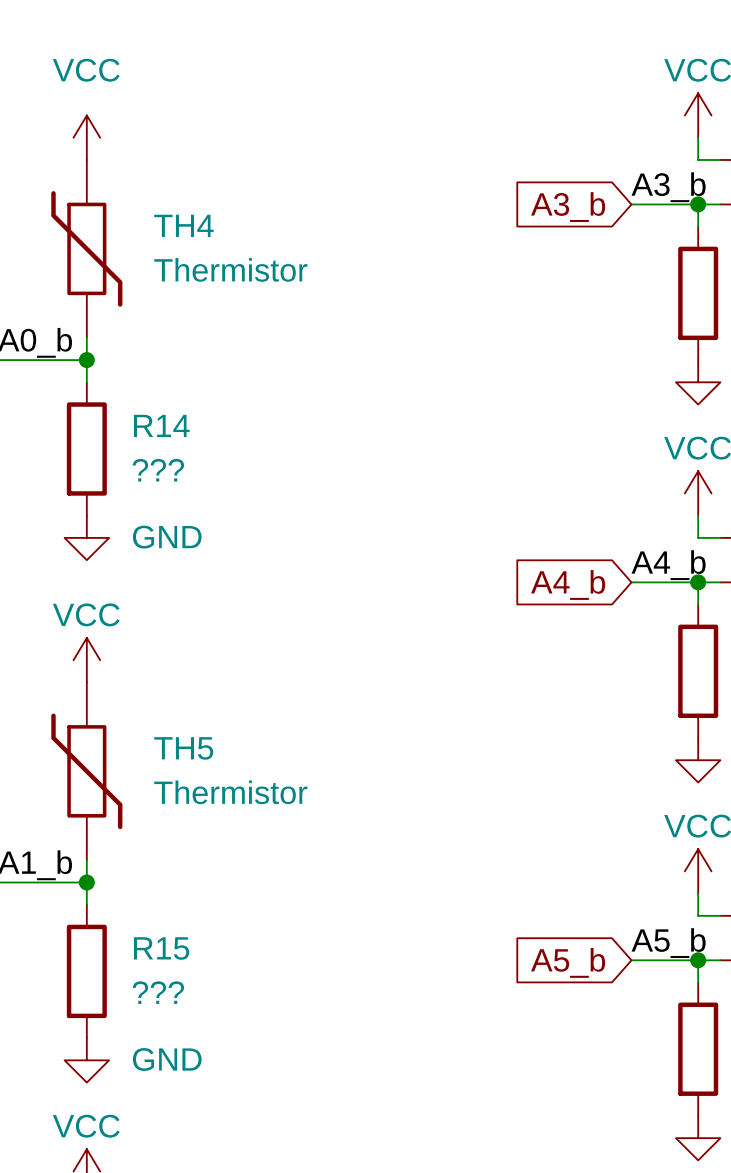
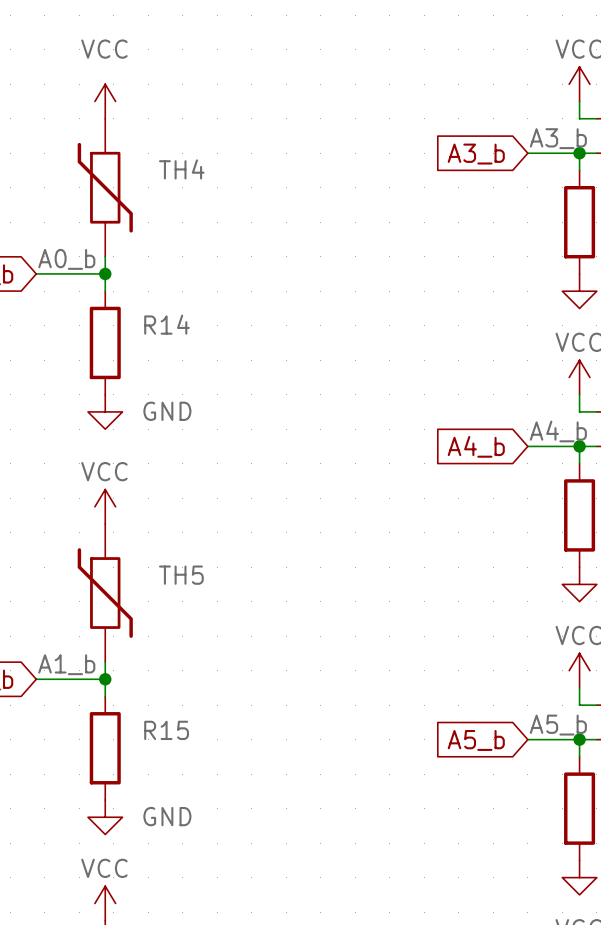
TH4 value: Thermistor (230, 269) -> none
R14 value: ??? (158, 470) -> none
TH5 value: Thermistor (230, 792) -> none
R15 value: ??? (158, 992) -> none

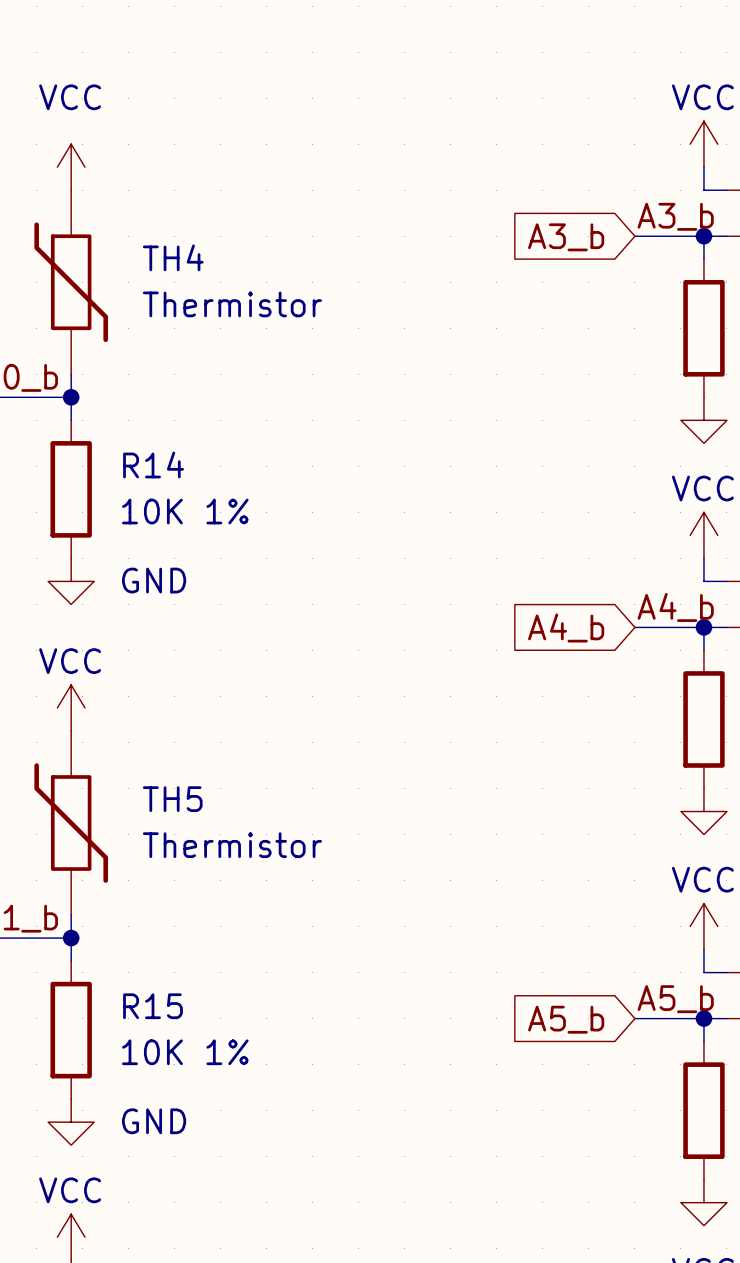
TH4 value: none -> Thermistor (232, 304)
R14 value: none -> 10K 1% (185, 511)
TH5 value: none -> Thermistor (232, 845)
R15 value: none -> 10K 1% (185, 1052)

